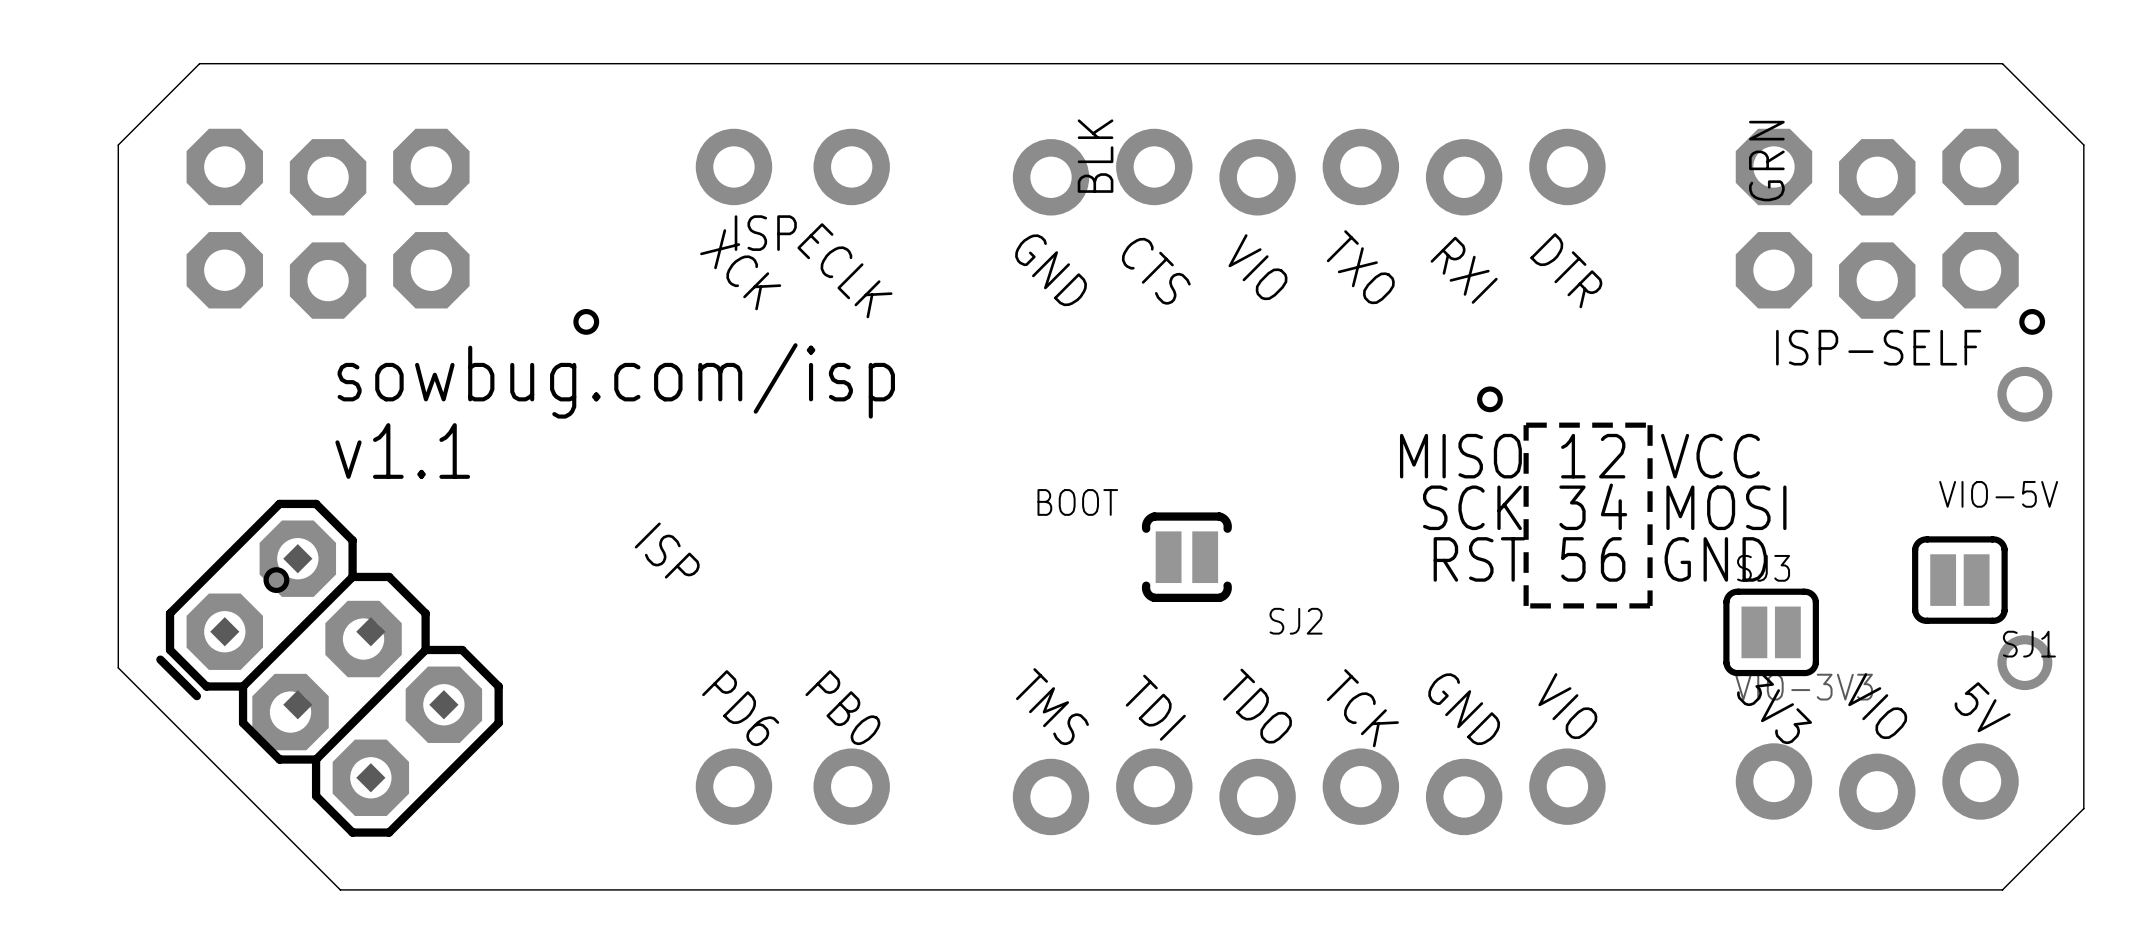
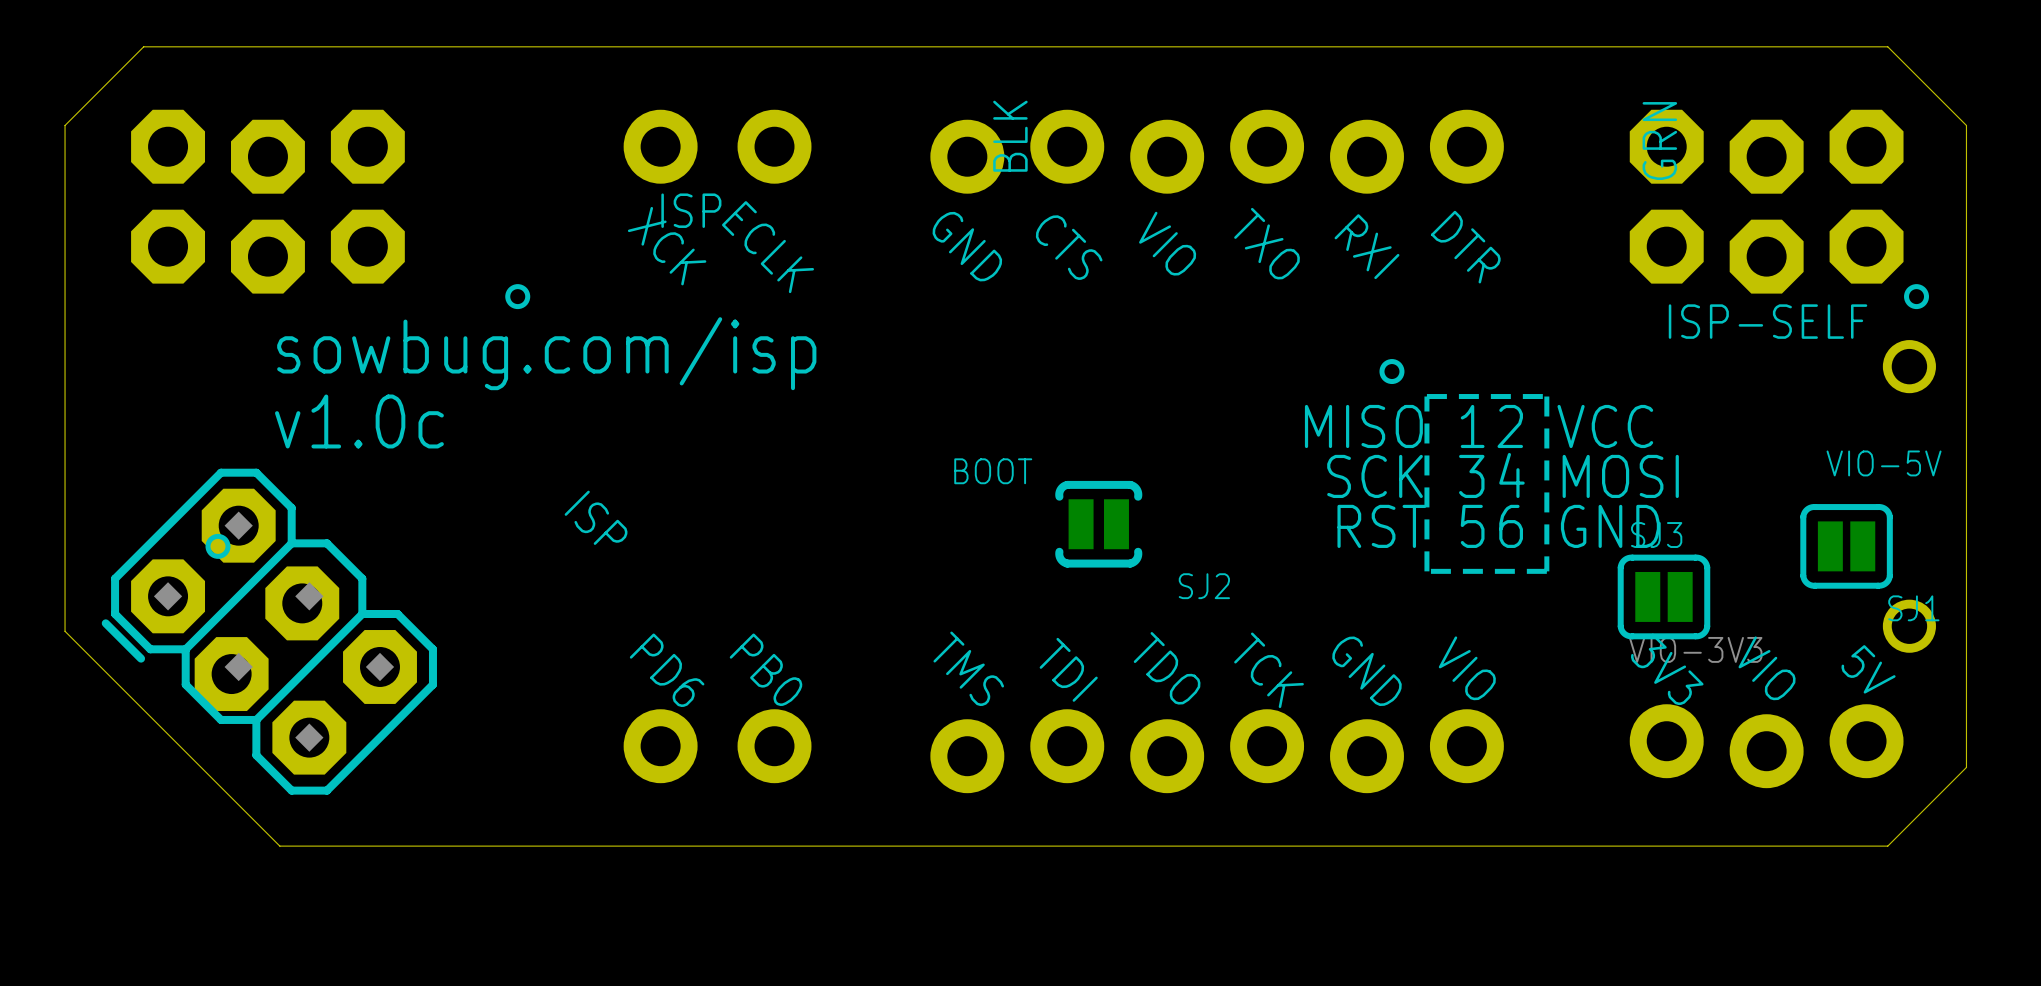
text: v1.1 (402, 450) -> v1.0c (359, 421)

